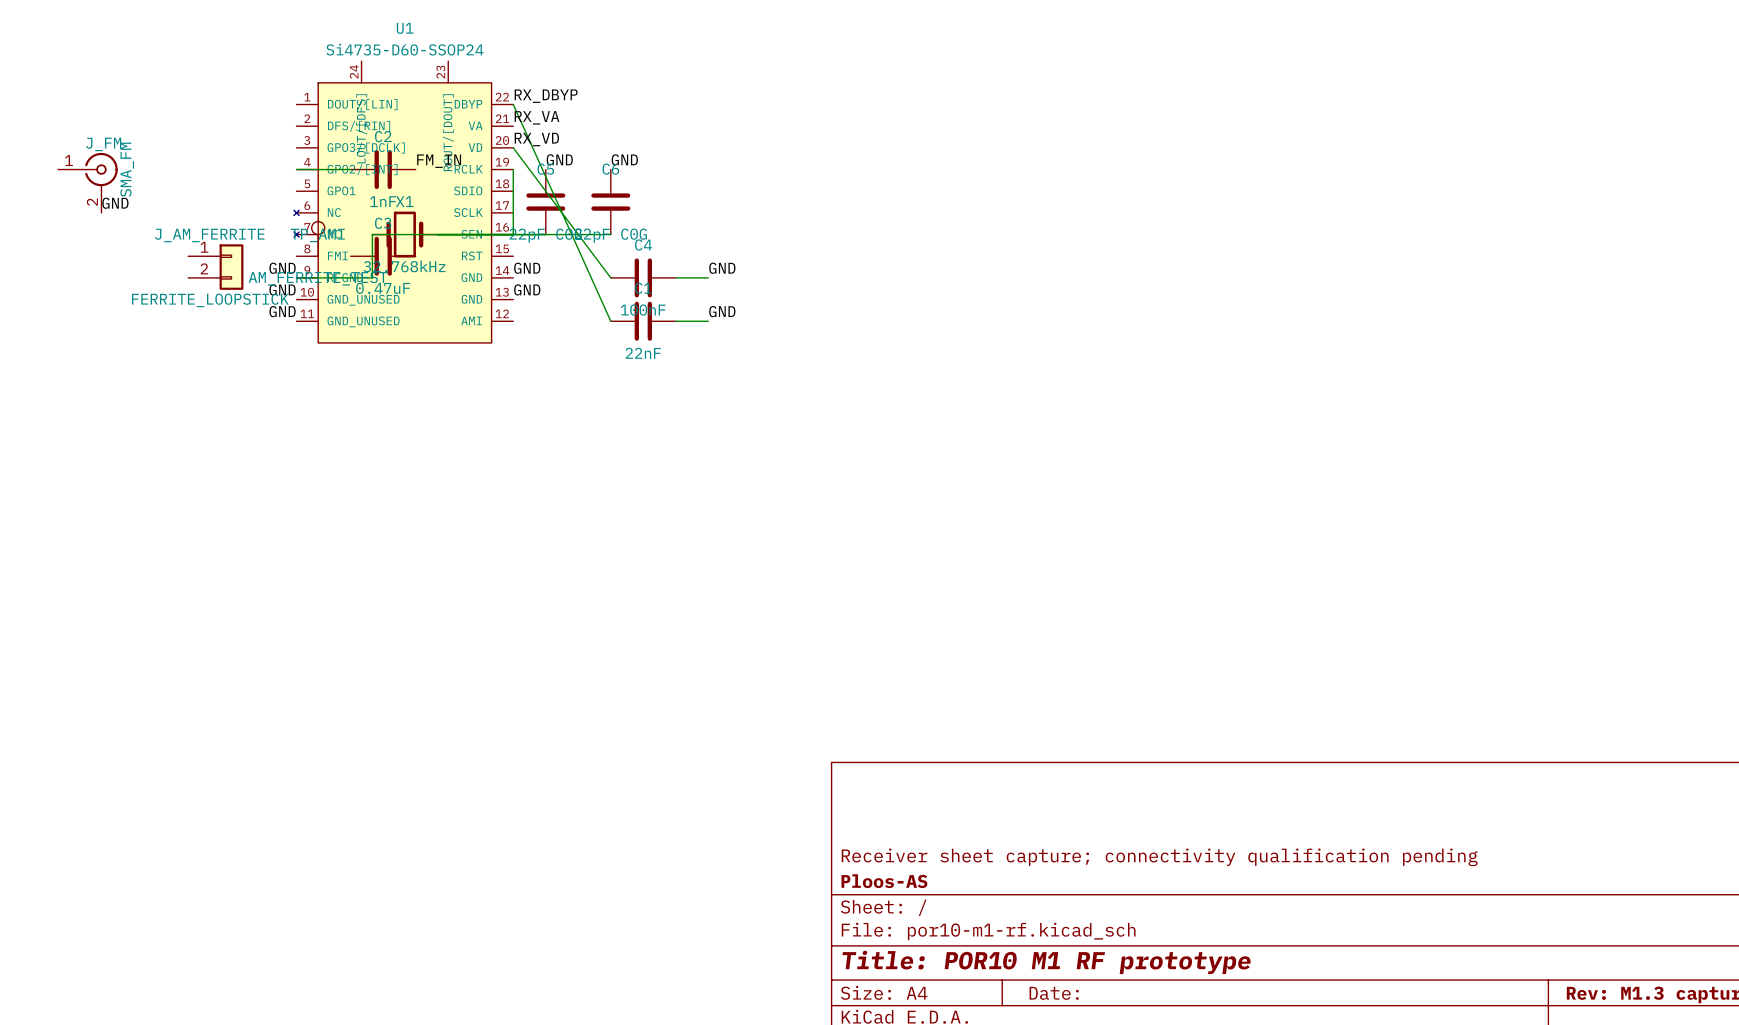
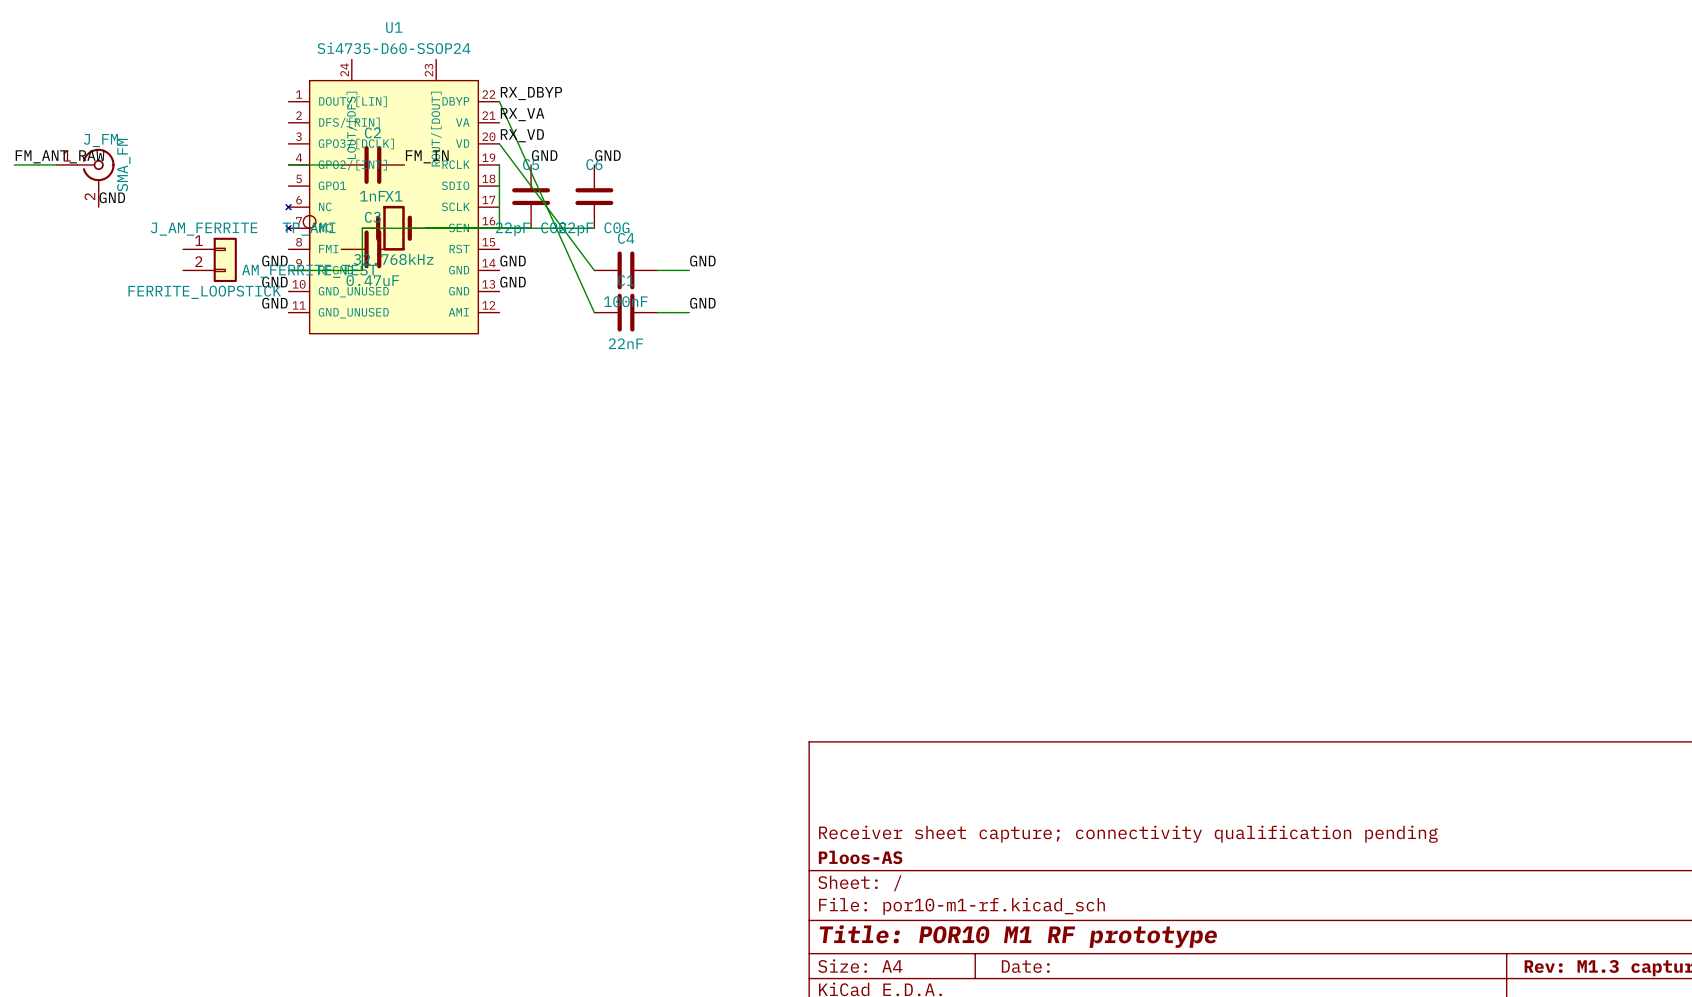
label: none -> FM_ANT_RAW (60, 156)
wire: none -> (14, 164) (56, 164)

